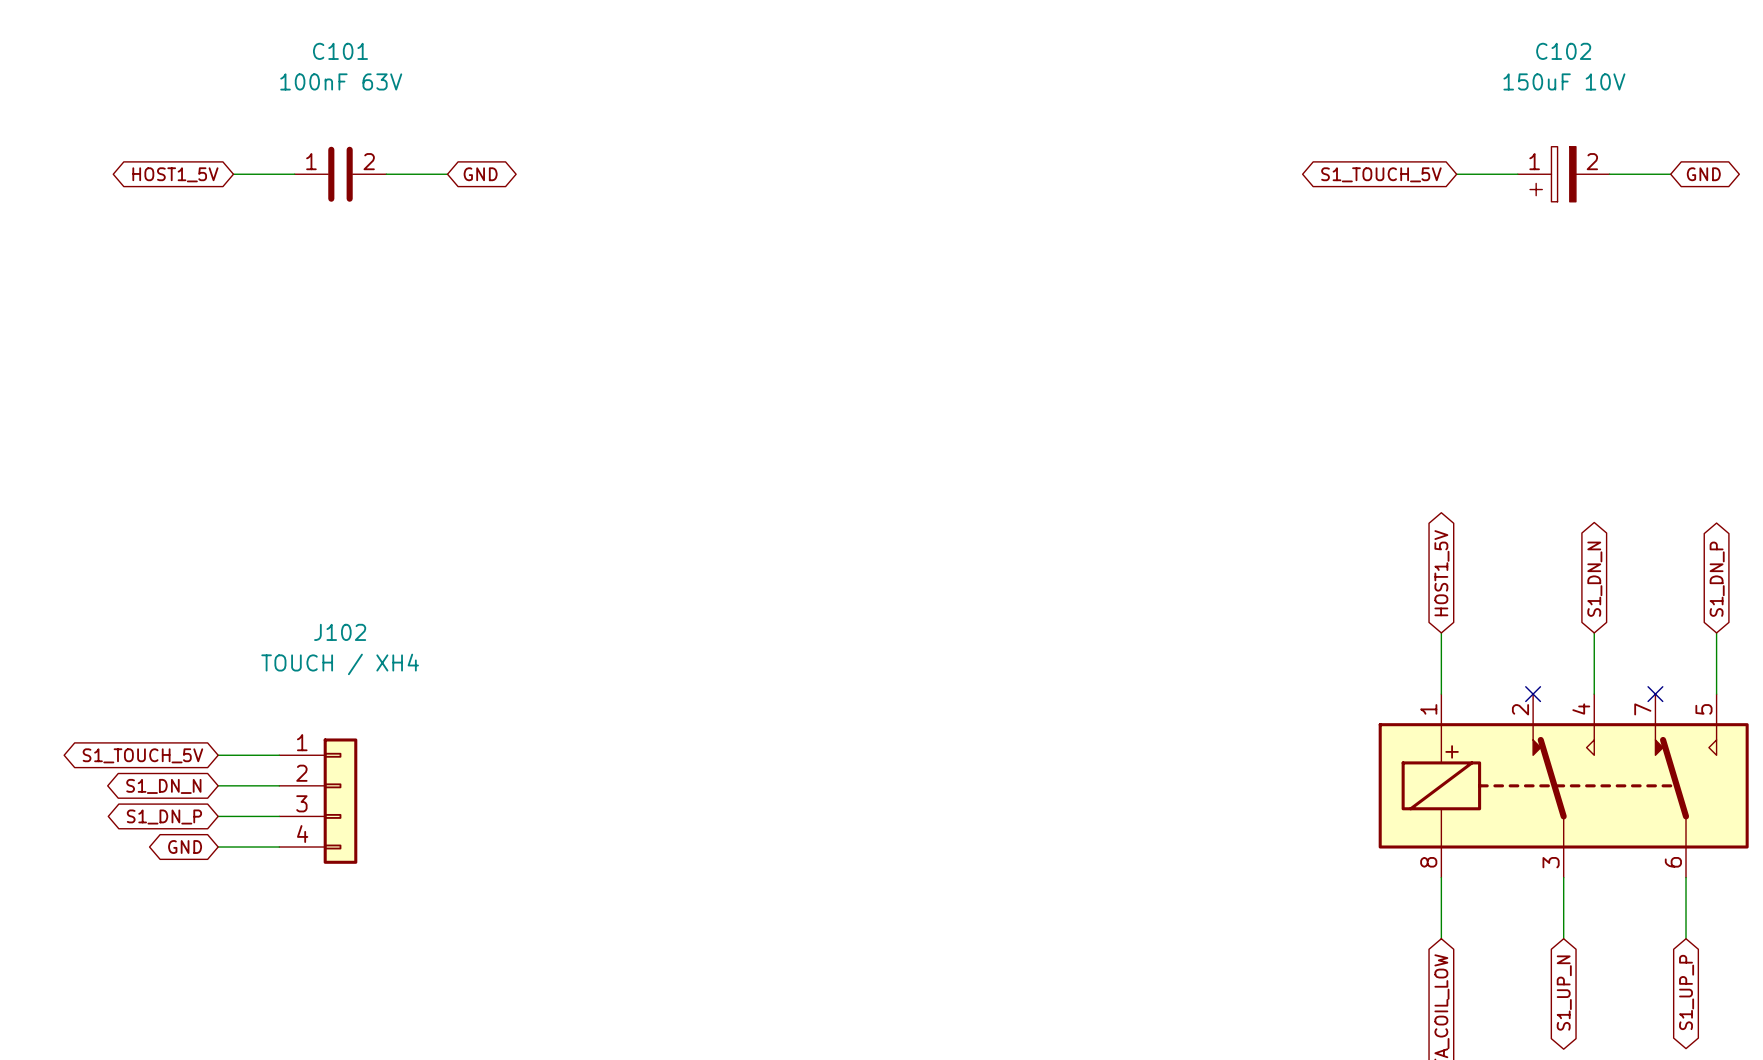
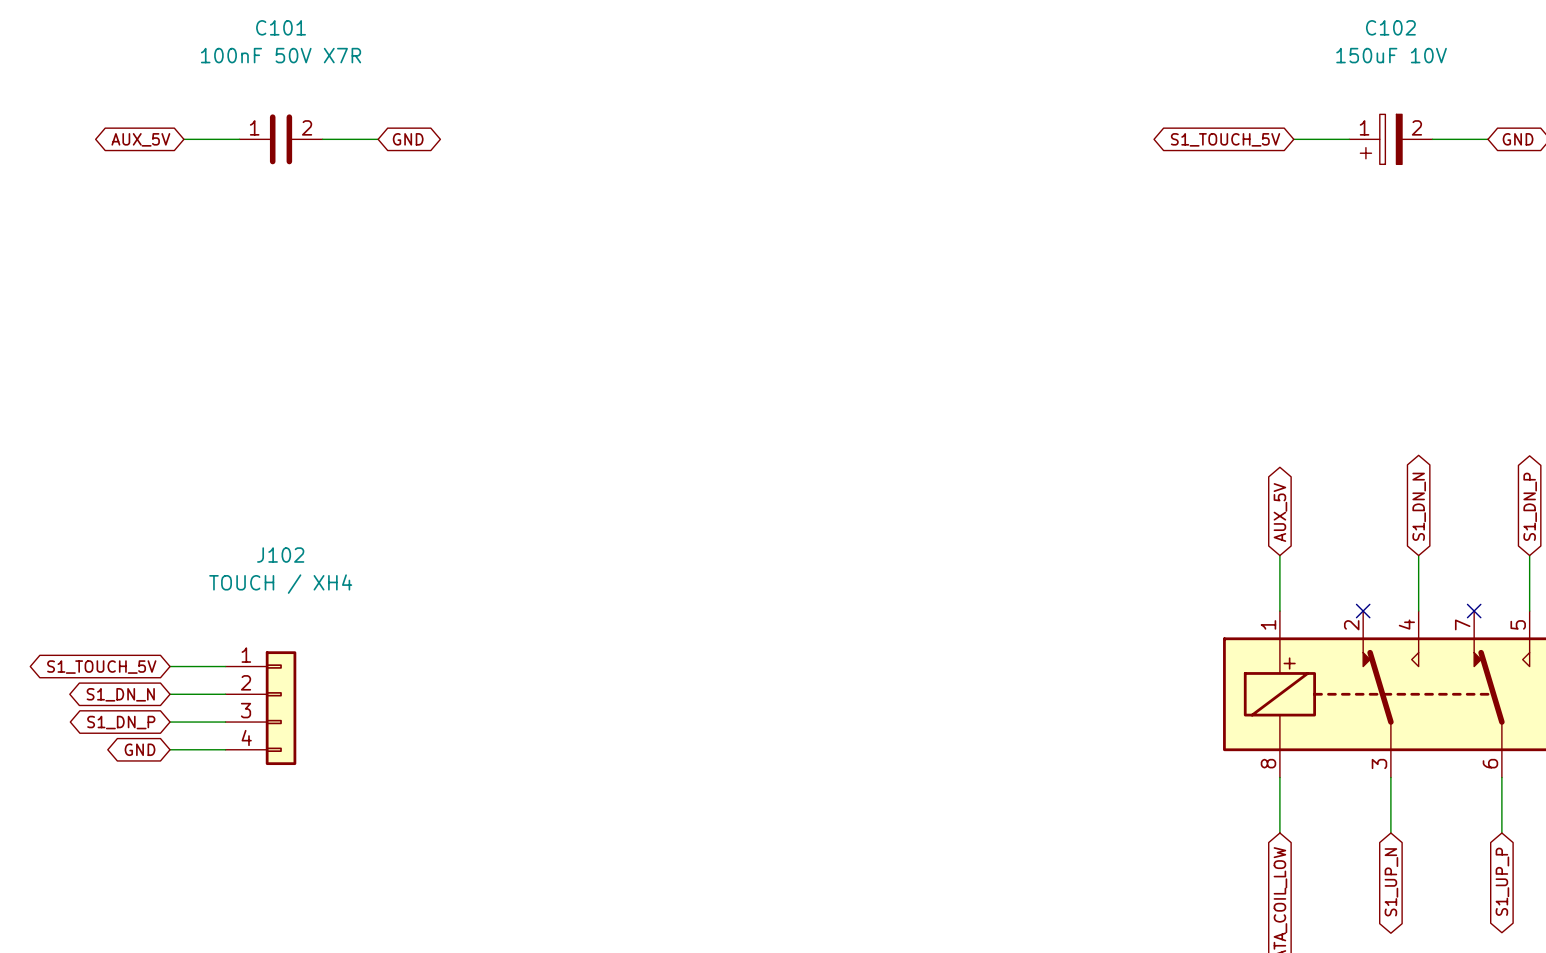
C101 value: 100nF 63V (341, 81) -> 100nF 50V X7R (281, 55)
global label: HOST1_5V (175, 174) -> AUX_5V (140, 139)
global label: HOST1_5V (1441, 573) -> AUX_5V (1280, 512)

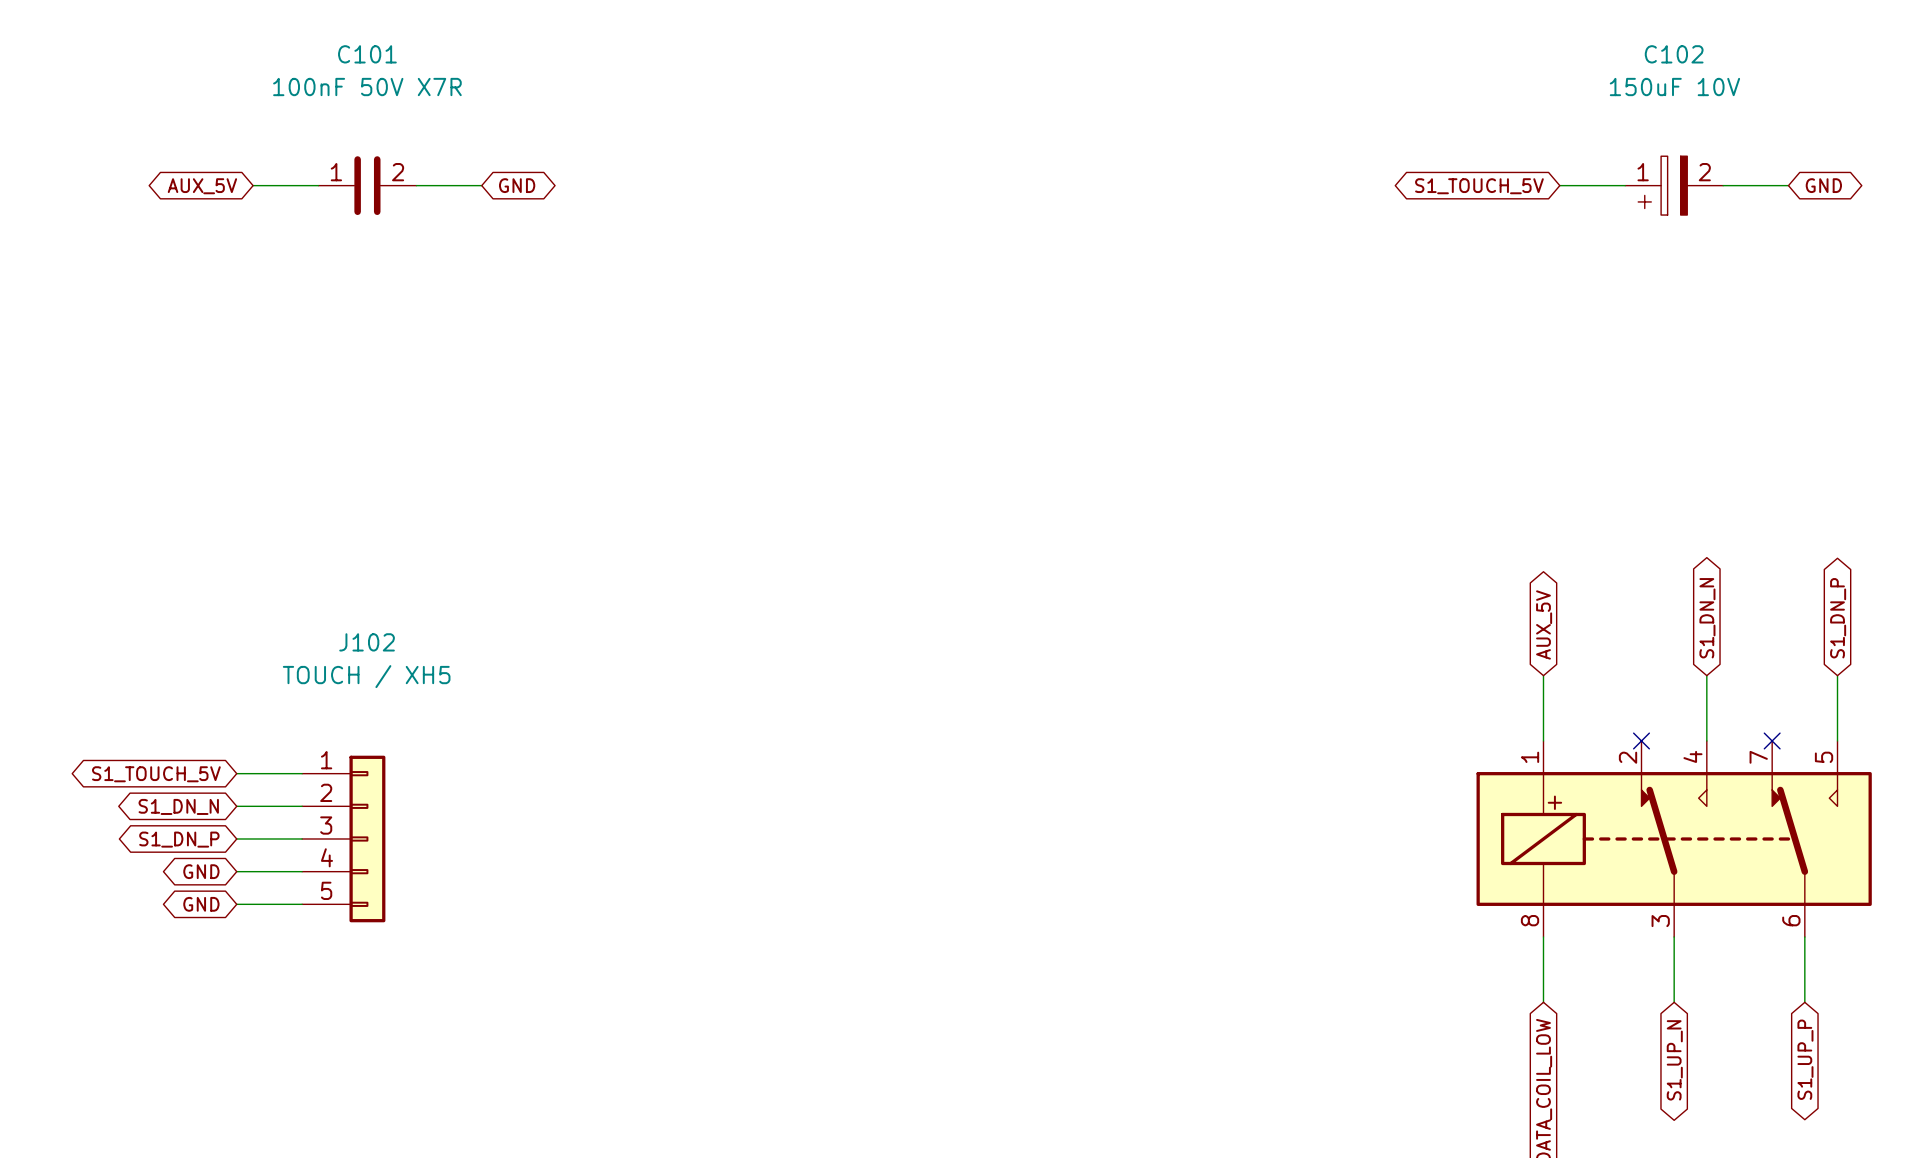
J102 value: TOUCH / XH4 (280, 584) -> TOUCH / XH5 (366, 676)
wire: none -> (236, 773) (302, 773)
global label: none -> S1_TOUCH_5V (156, 774)
J102 symbol: [225, 651, 297, 766] -> [302, 755, 386, 923]
global label: S1_TOUCH_5V (101, 667) -> S1_DN_N (178, 806)
global label: S1_DN_N (120, 694) -> S1_DN_P (179, 839)
global label: S1_DN_P (121, 722) -> GND (201, 871)

